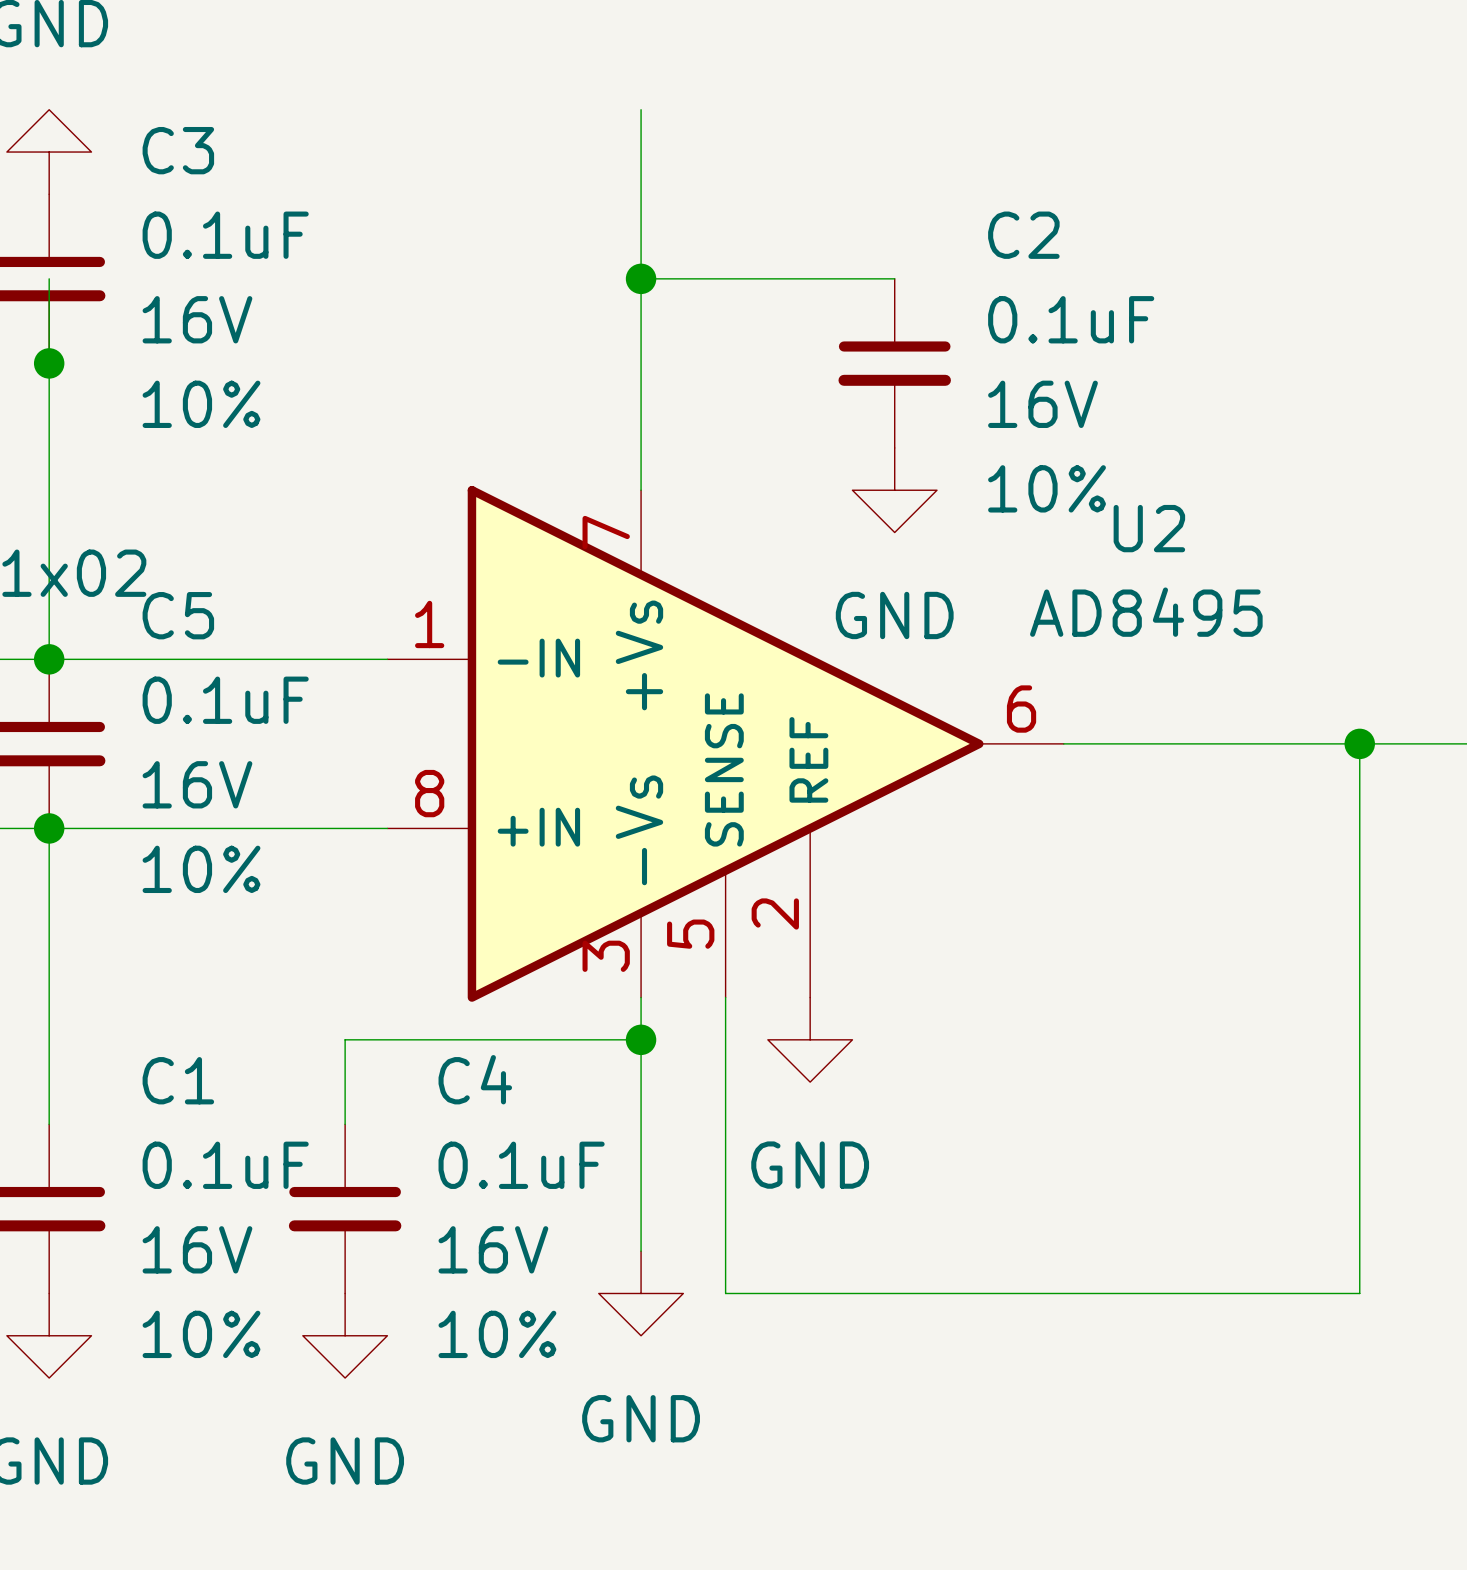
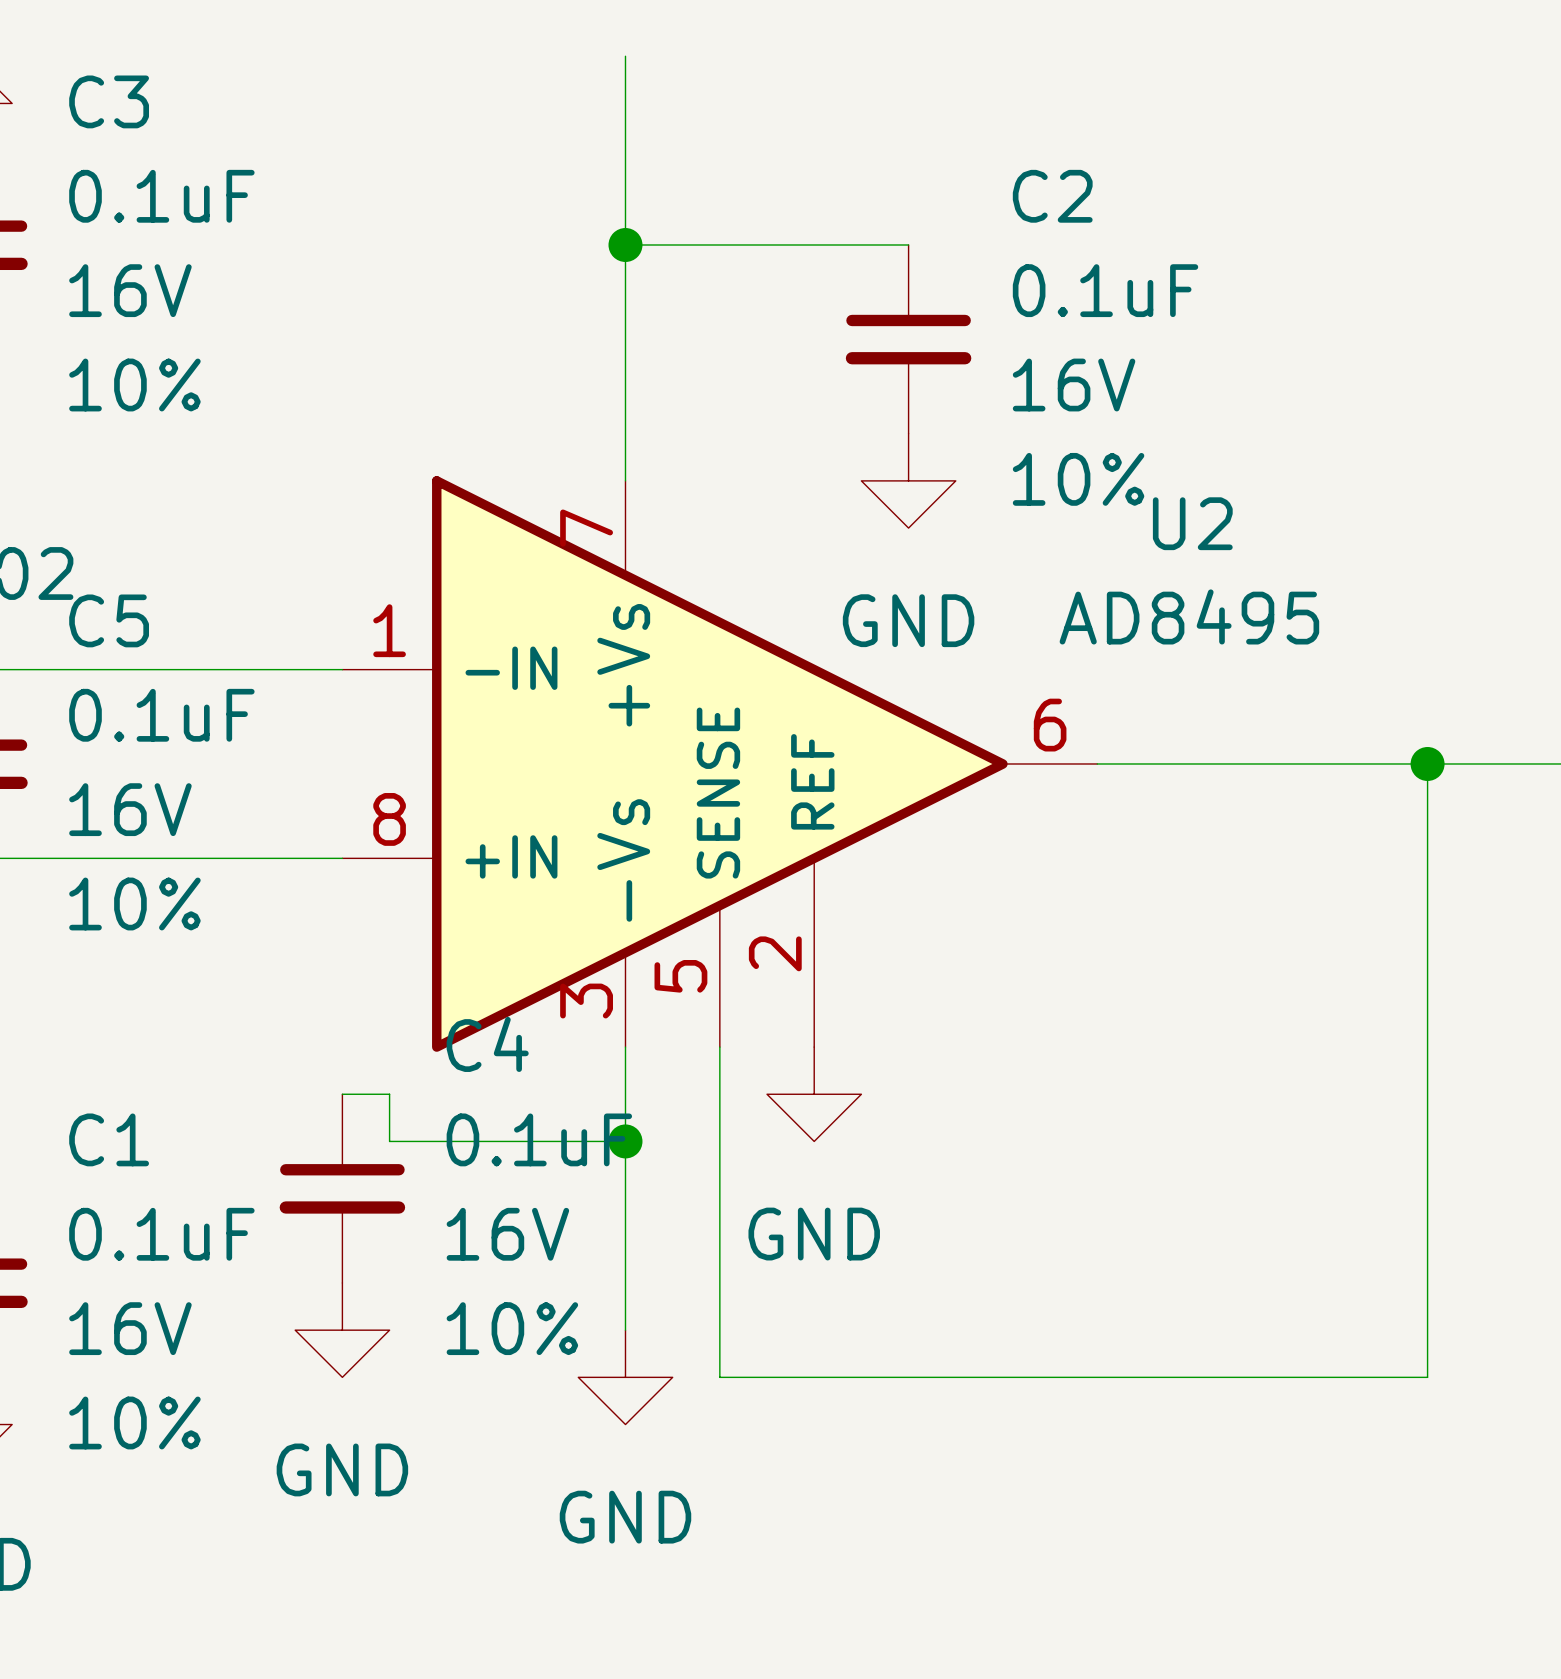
wire: (387, 1039) (345, 1039) (345, 1124) -> none
wire: (429, 1039) (641, 1039) -> (389, 1094) (389, 1141) (625, 1141)
junction position: (641, 1039) -> (625, 1141)
C4 position: (345, 1208) -> (342, 1188)
power symbol position: GND (345, 1335) -> GND (342, 1330)

